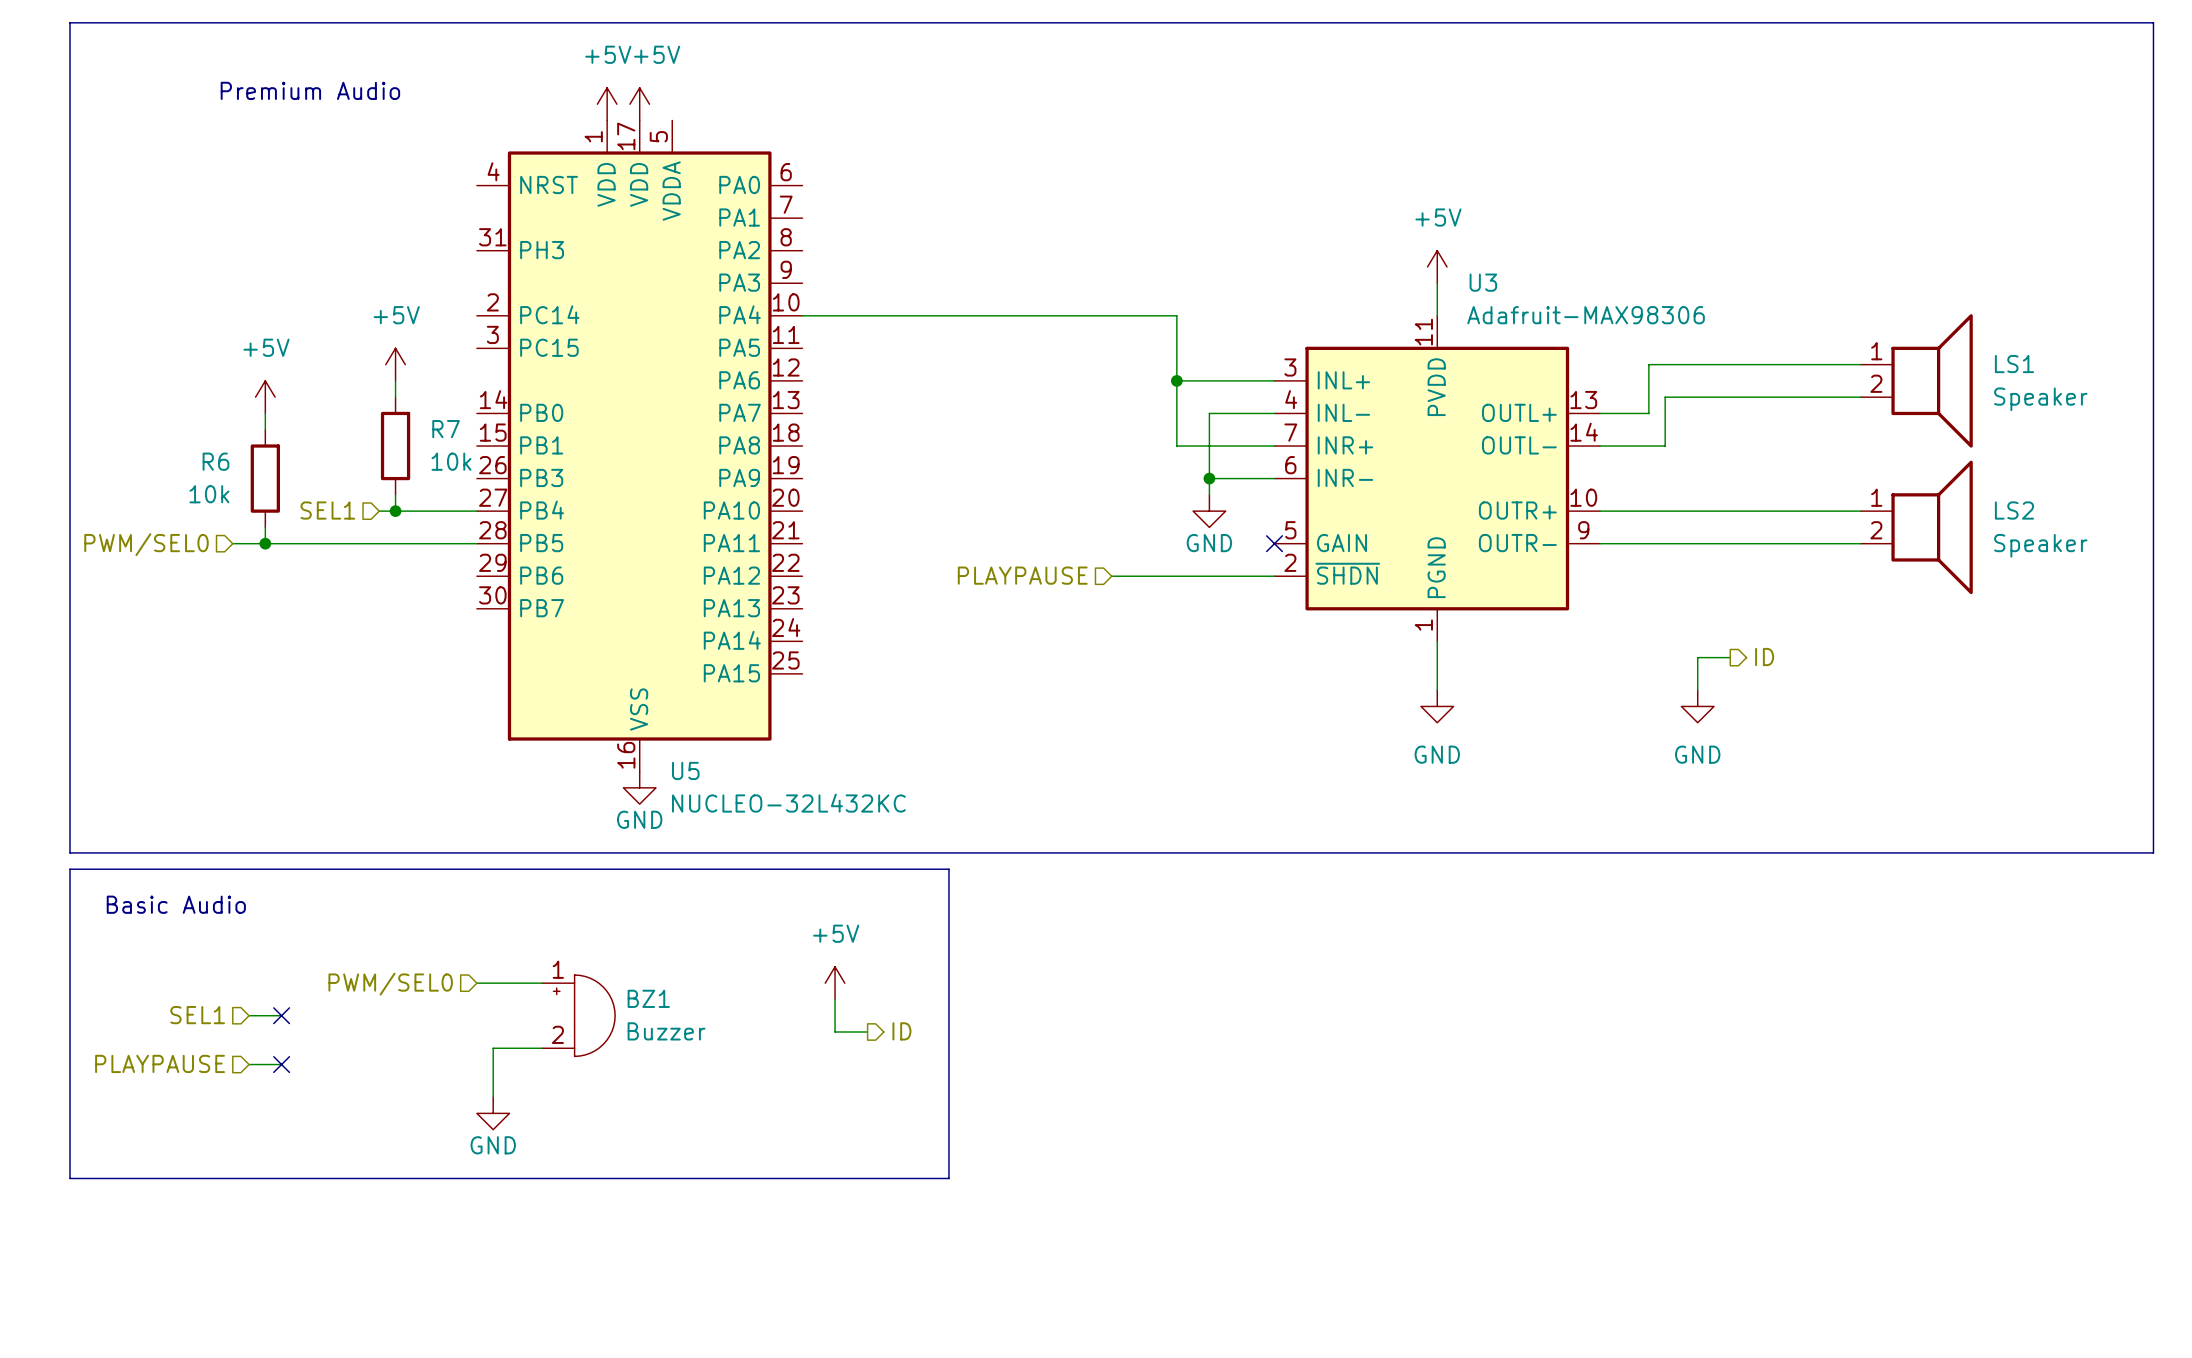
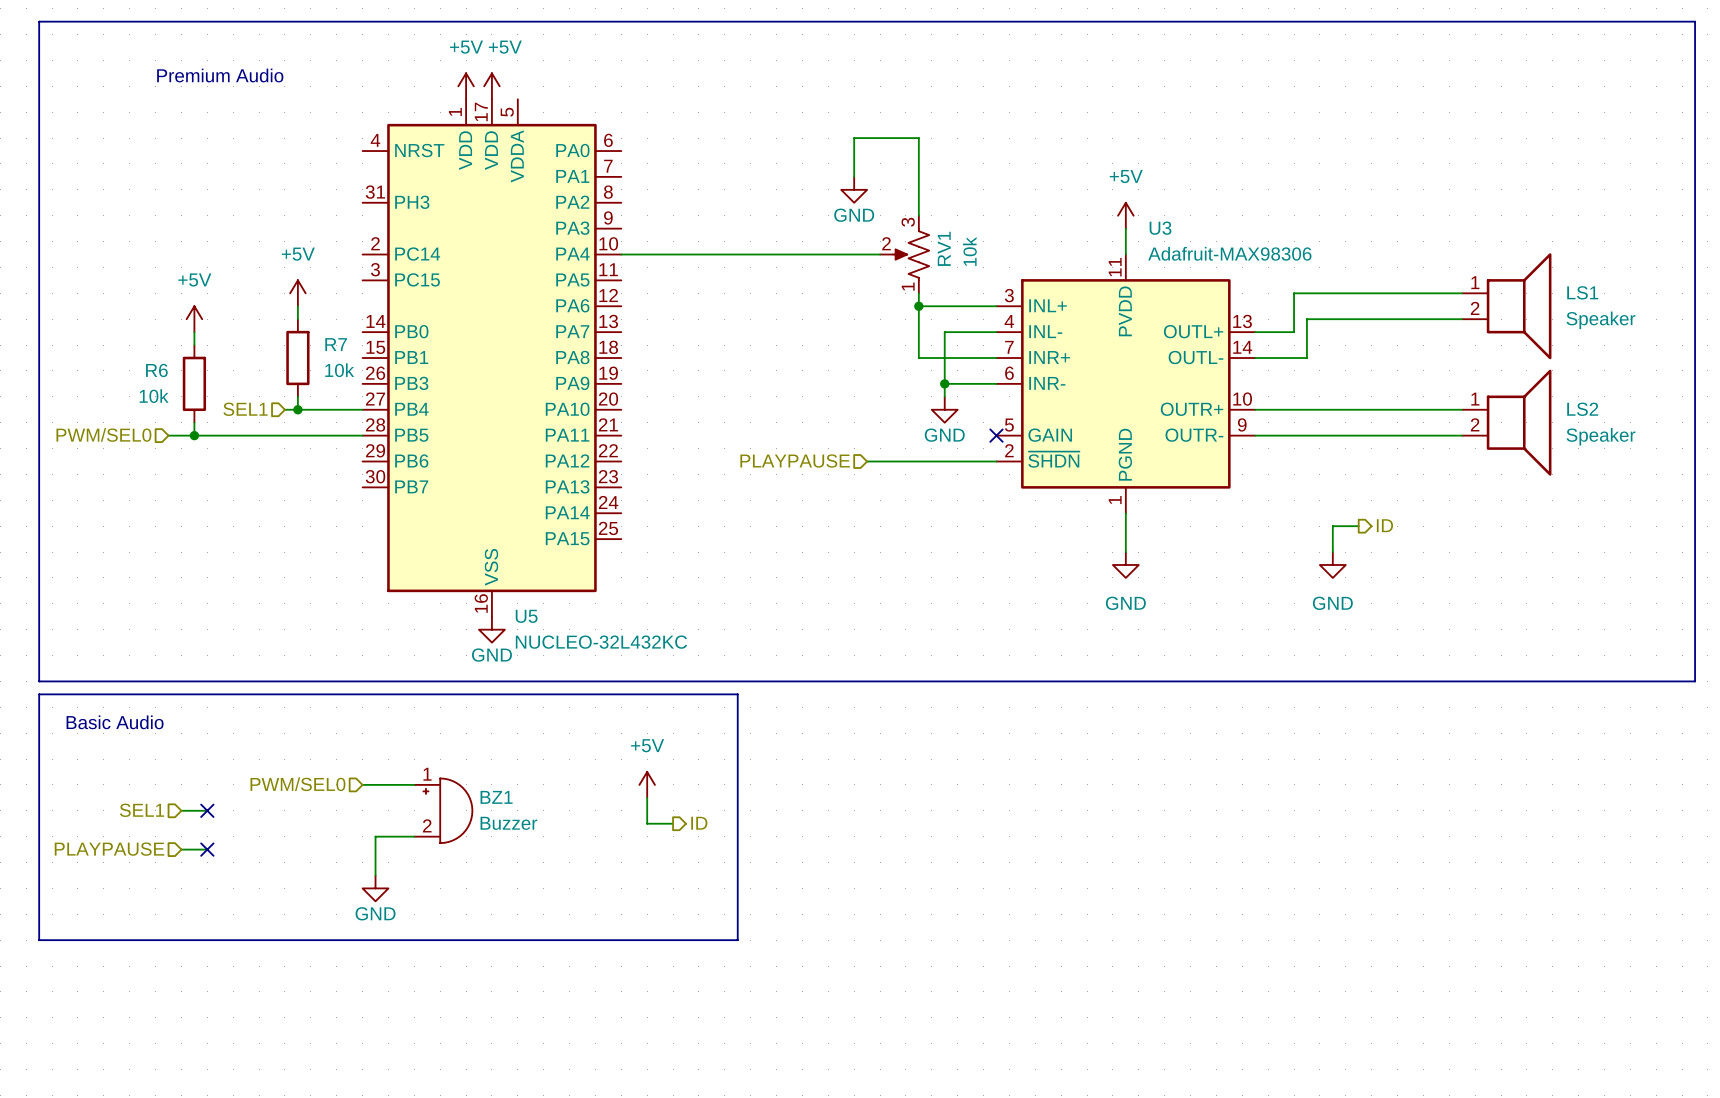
wire: none -> (854, 176) (854, 138) (918, 138) (918, 215)
power symbol: none -> GND (854, 189)
RV1: none -> 10k (904, 254)

